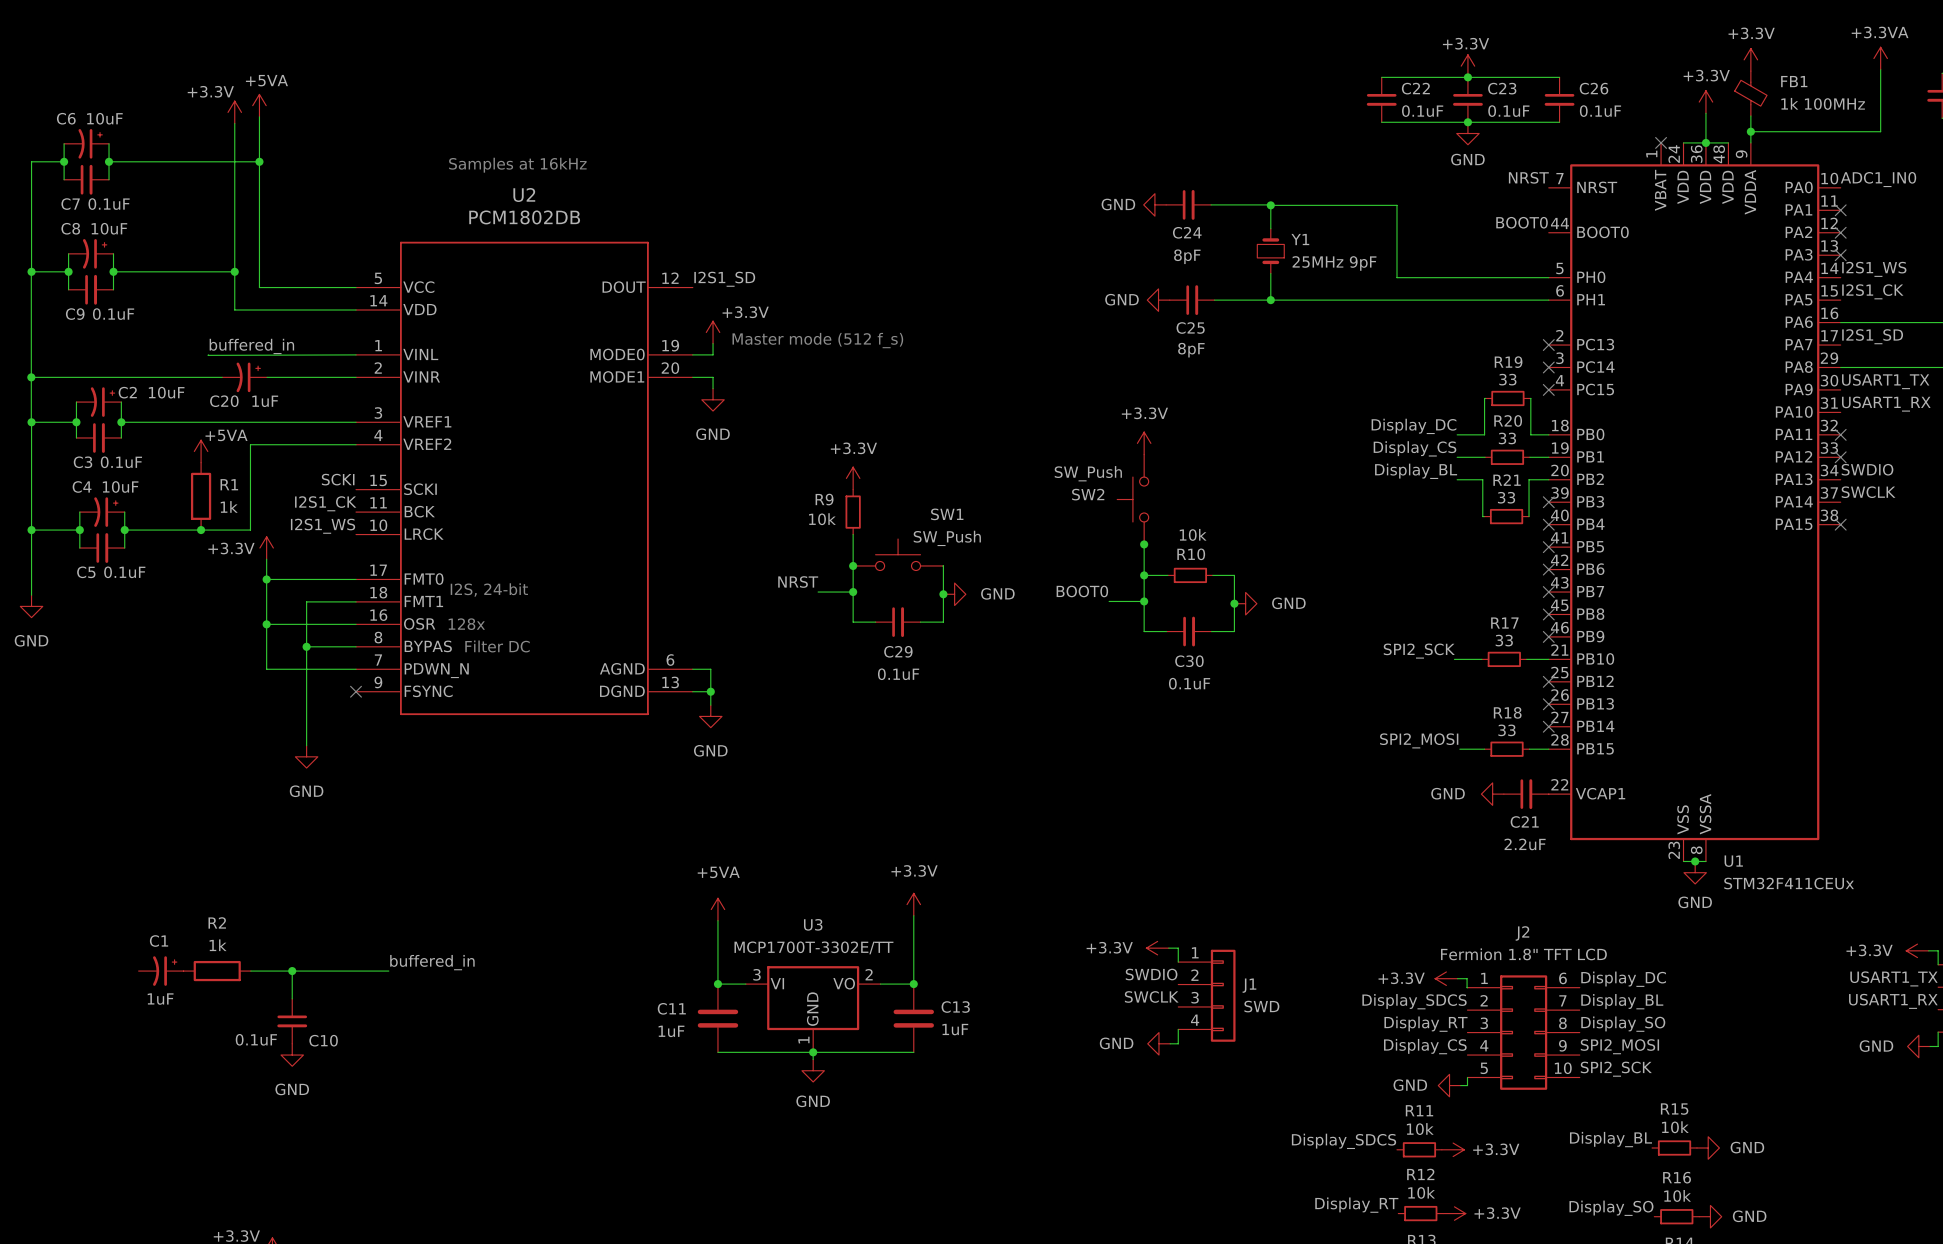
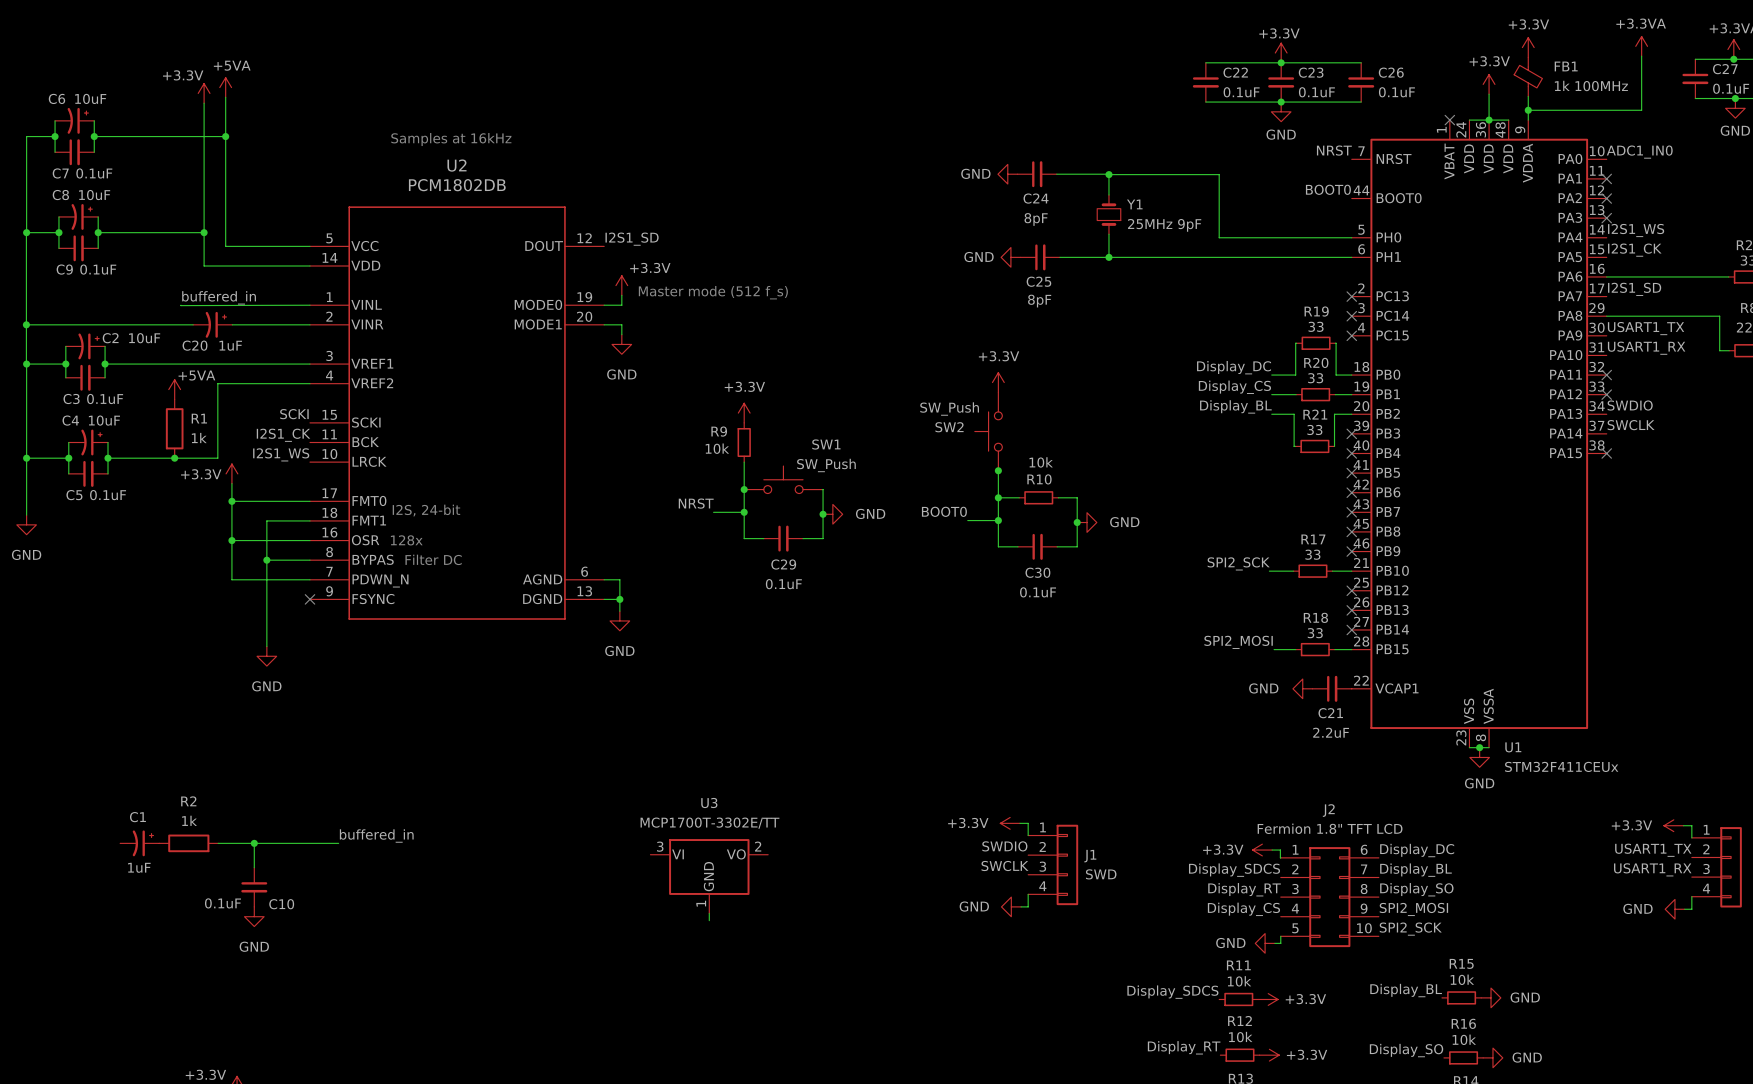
power symbol: +3.3V (913, 904) -> none
power symbol: +5VA (717, 909) -> none
wire: (913, 915) (913, 984) -> none
wire: (717, 920) (717, 984) -> none
wire: (717, 984) (745, 984) -> none
junction: (717, 984) -> none
wire: (880, 984) (913, 984) -> none
junction: (913, 984) -> none
C11: 1uF (717, 1018) -> none
C13: 1uF (913, 1018) -> none
wire: (717, 1052) (913, 1052) -> none
junction: (813, 1052) -> none
power symbol: GND (813, 1070) -> none

